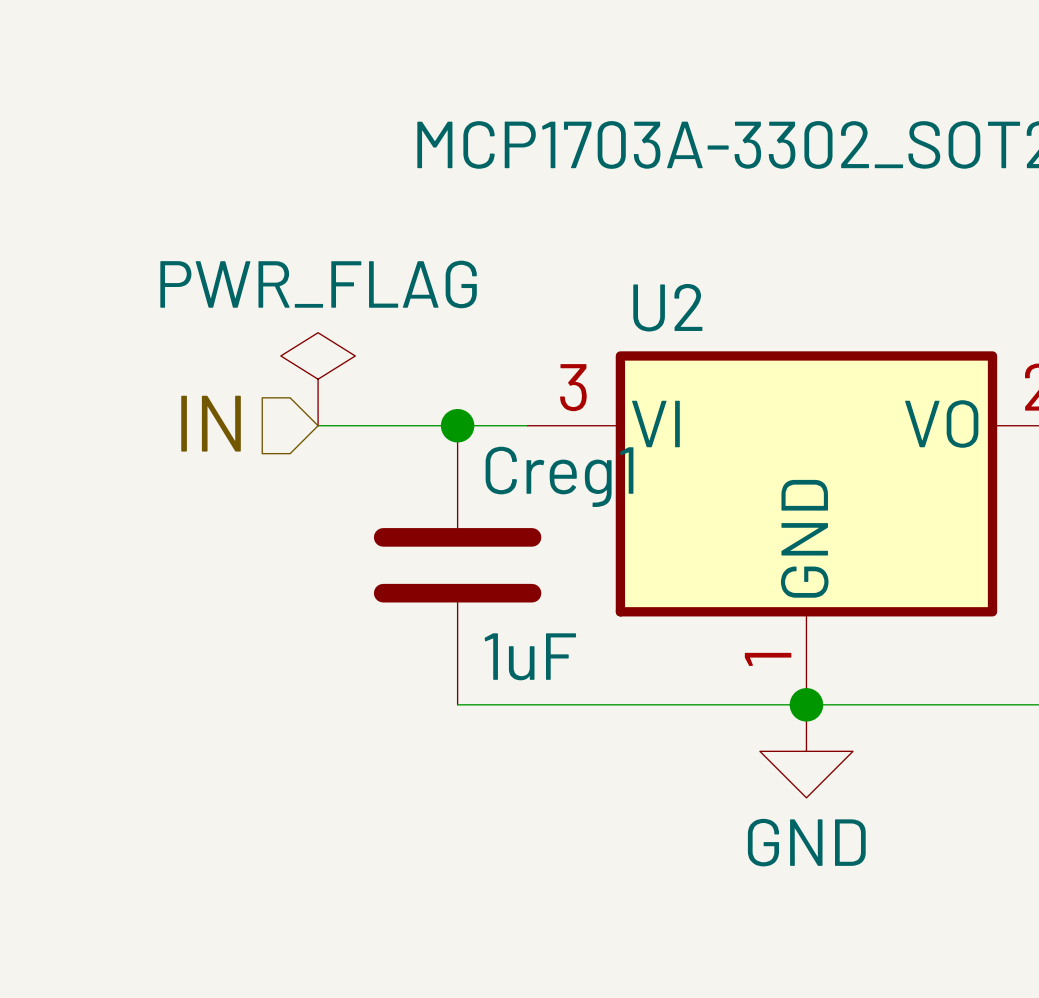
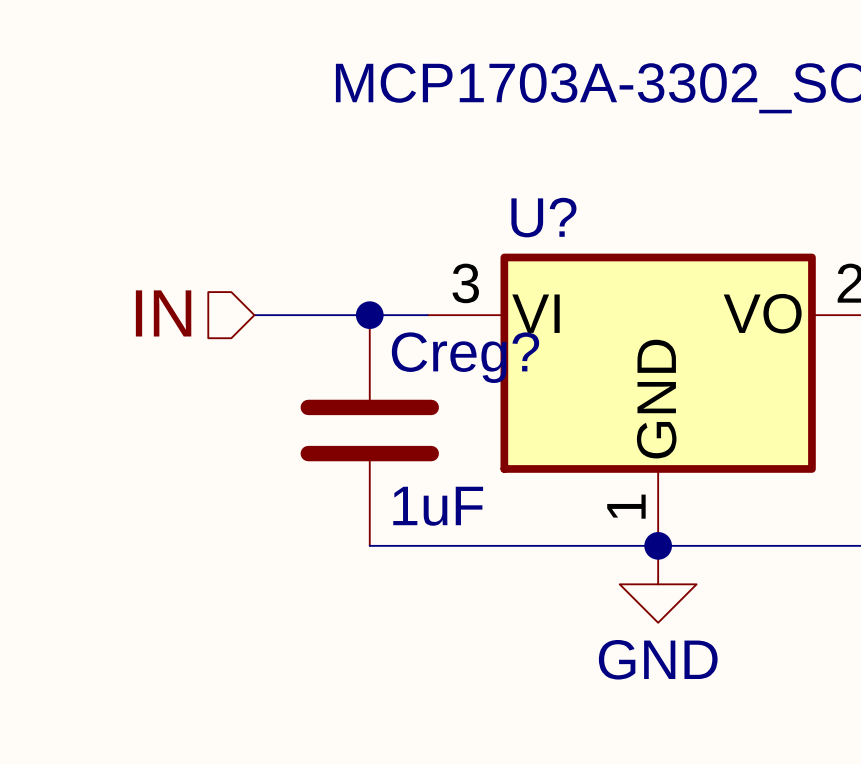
U2 name: U2 (667, 307) -> U? (543, 217)
power symbol: PWR_FLAG (318, 379) -> none
Creg1 name: Creg1 (559, 476) -> Creg? (465, 357)

